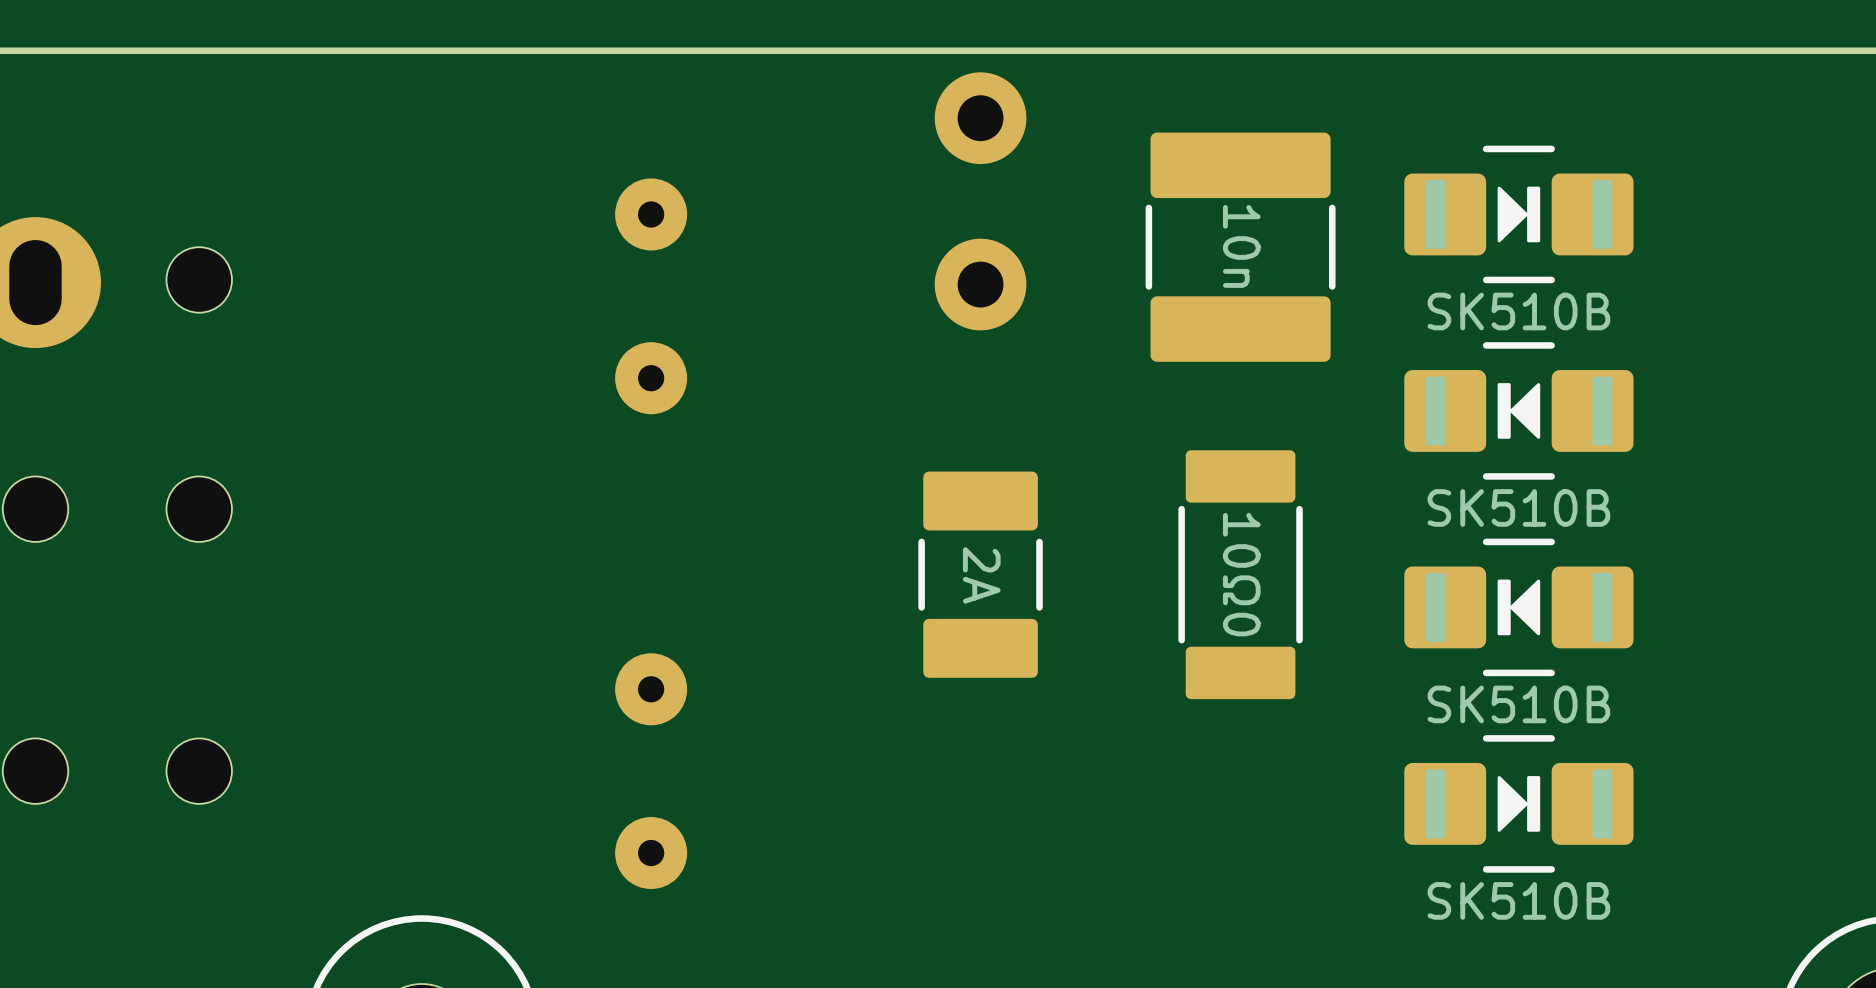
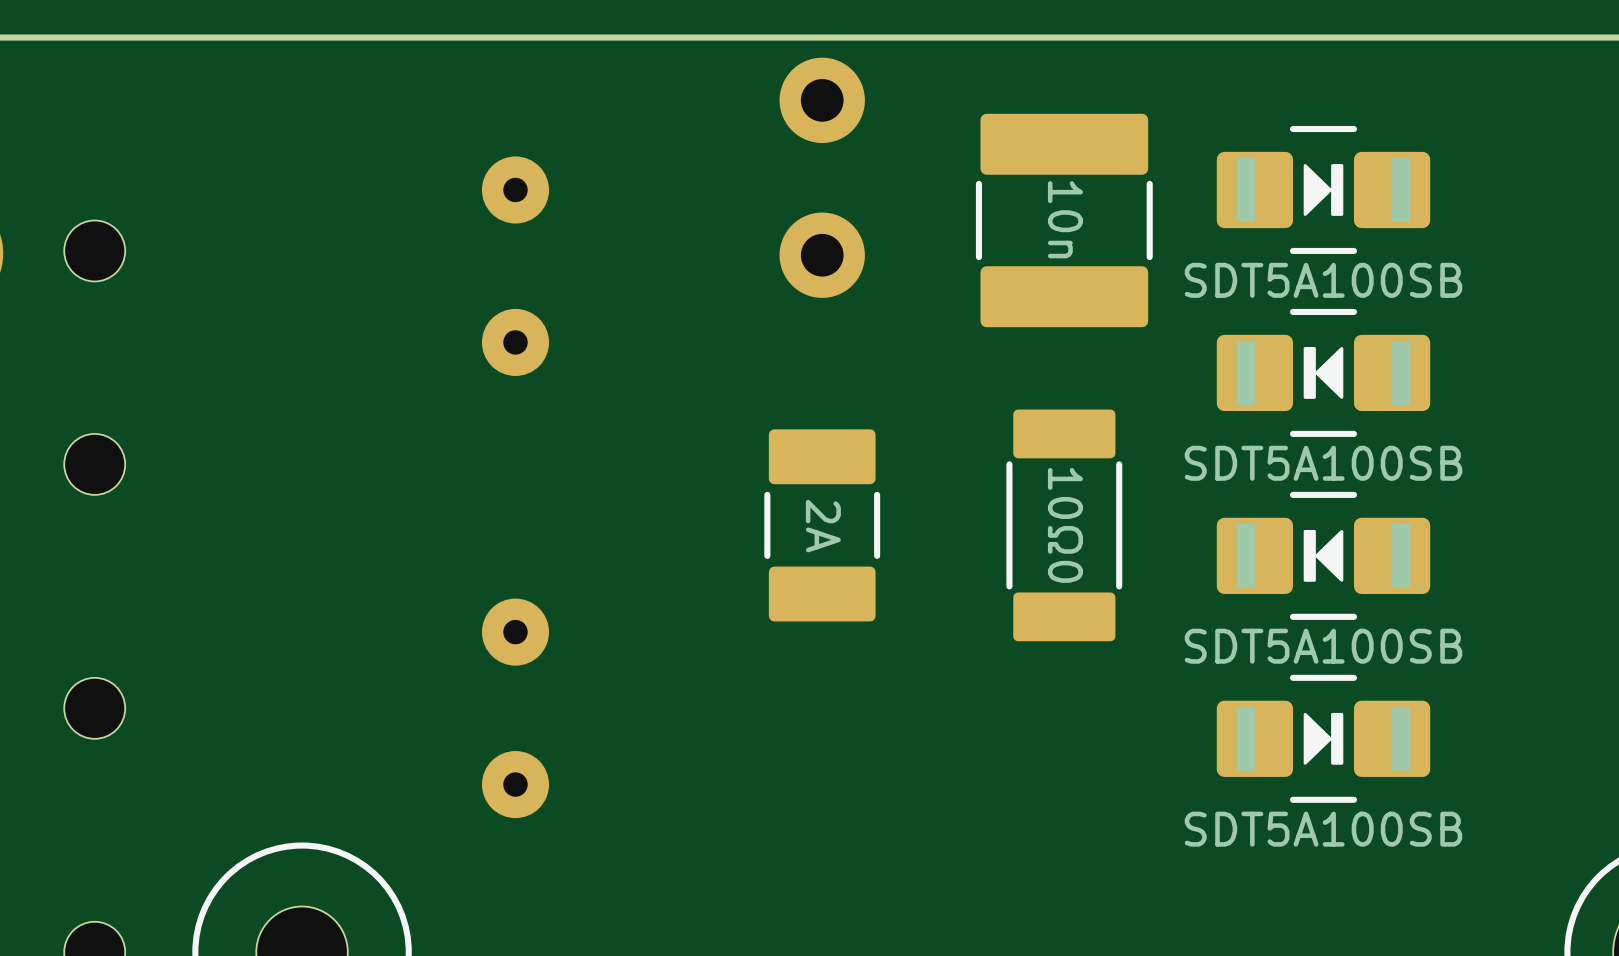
part value: SK510B (1518, 311) -> SDT5A100SB (1323, 280)
part value: SK510B (1518, 507) -> SDT5A100SB (1323, 463)
part value: SK510B (1518, 704) -> SDT5A100SB (1323, 646)
part value: SK510B (1518, 900) -> SDT5A100SB (1323, 829)

